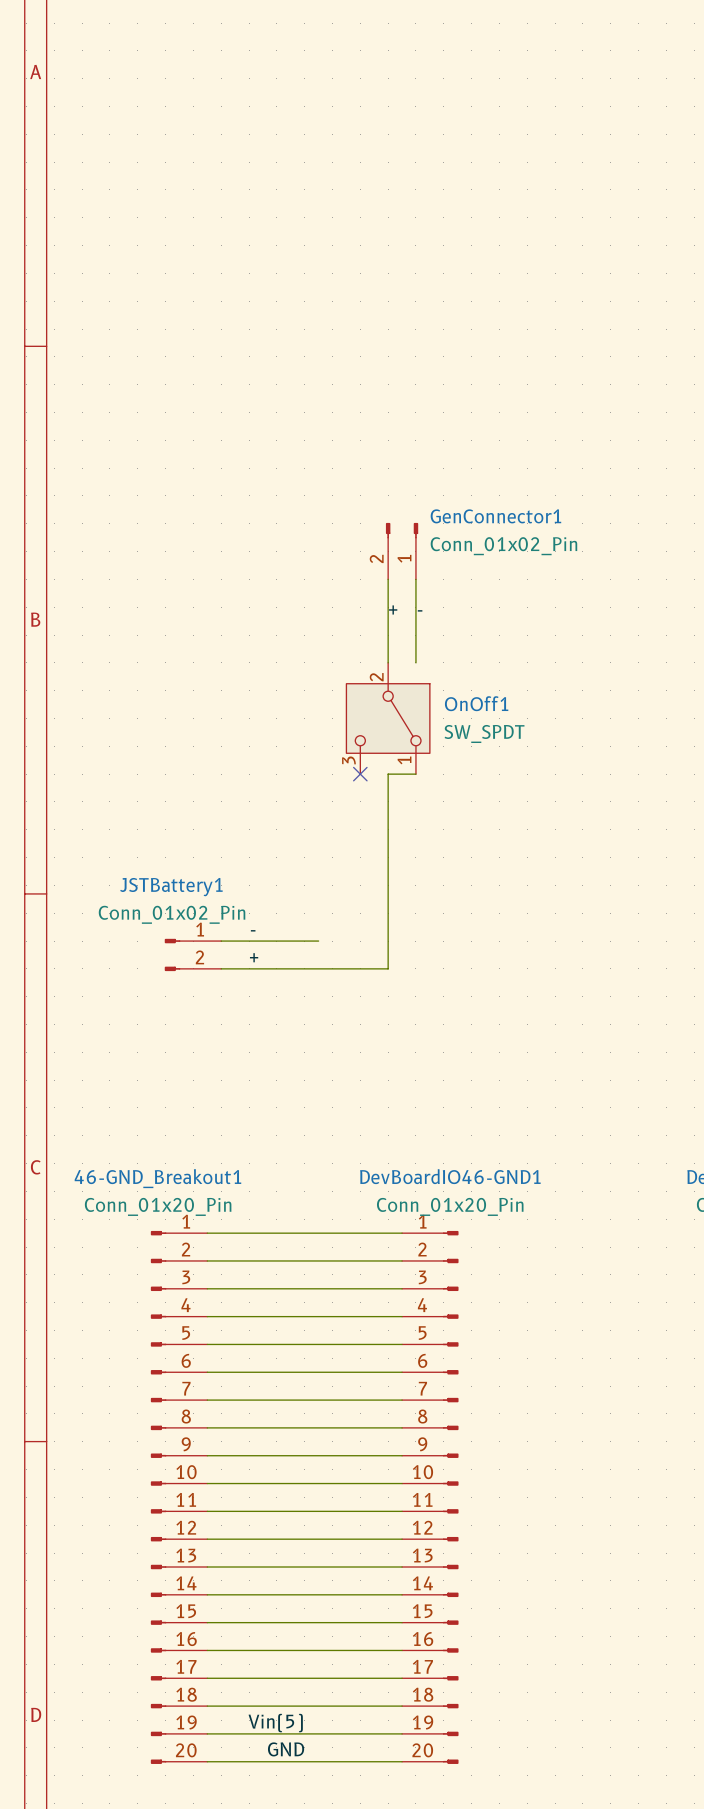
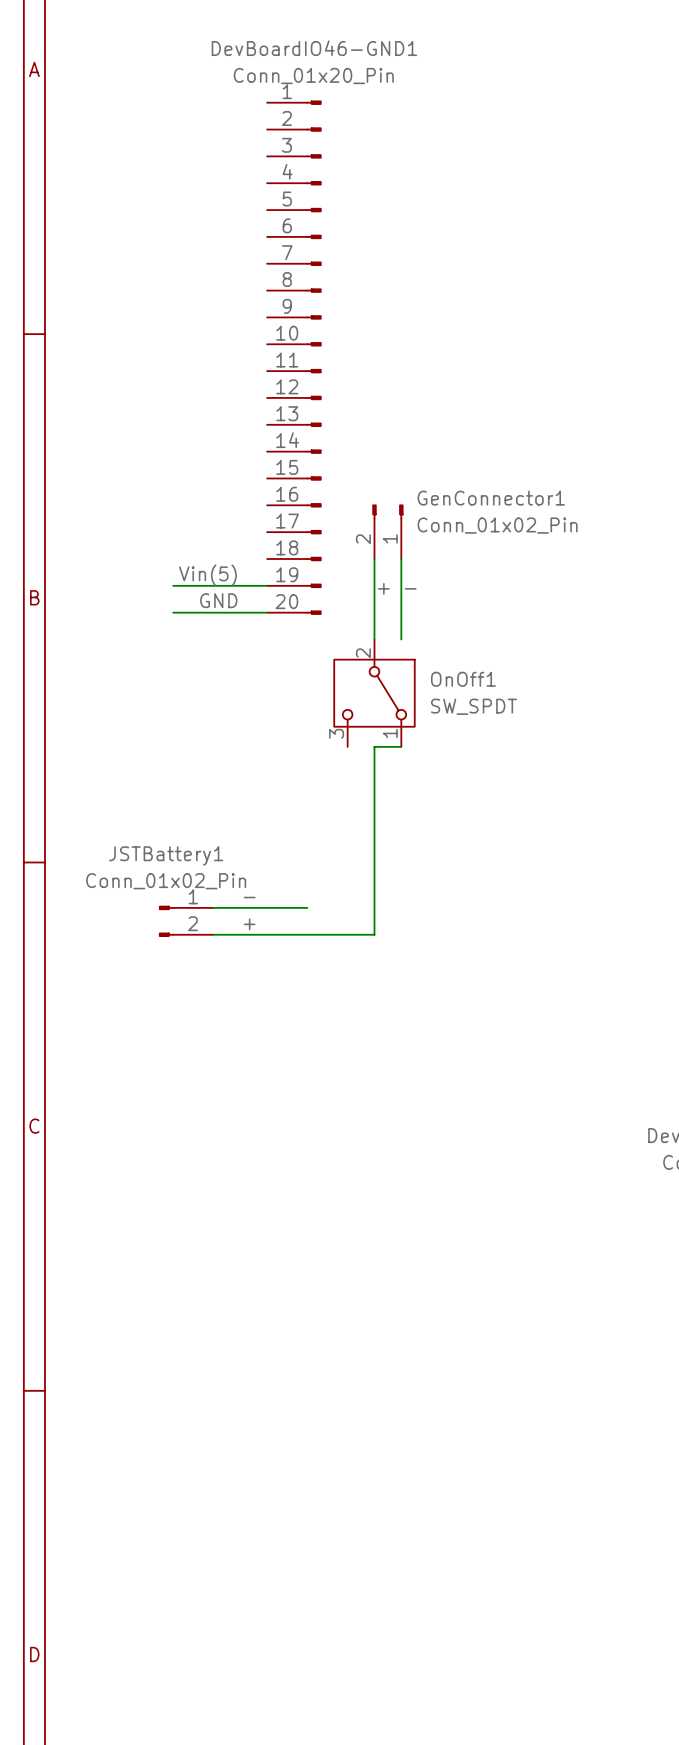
label: none -> Vin(5) (207, 575)
wire: none -> (173, 585) (267, 585)
label: none -> GND (218, 600)
wire: none -> (173, 612) (267, 612)
no-connect mark: (360, 774) -> none
wire: (207, 1233) (402, 1233) -> none
wire: (207, 1260) (402, 1260) -> none
wire: (207, 1288) (402, 1288) -> none
wire: (207, 1316) (402, 1316) -> none
wire: (207, 1344) (402, 1344) -> none
wire: (207, 1372) (402, 1372) -> none
wire: (207, 1400) (402, 1400) -> none
wire: (207, 1427) (402, 1427) -> none
wire: (207, 1455) (402, 1455) -> none
wire: (207, 1483) (402, 1483) -> none
46-GND_Breakout1: Conn_01x20_Pin (179, 1497) -> none
DevBoardIO46-GND1 position: (430, 1497) -> (294, 357)
wire: (207, 1511) (402, 1511) -> none
wire: (207, 1539) (402, 1539) -> none
wire: (207, 1567) (402, 1567) -> none
wire: (207, 1594) (402, 1594) -> none
wire: (207, 1622) (402, 1622) -> none
wire: (207, 1650) (402, 1650) -> none
wire: (207, 1678) (402, 1678) -> none
wire: (207, 1706) (402, 1706) -> none
label: Vin(5) (275, 1723) -> none
wire: (207, 1733) (402, 1733) -> none
label: GND (286, 1749) -> none
wire: (207, 1761) (402, 1761) -> none

